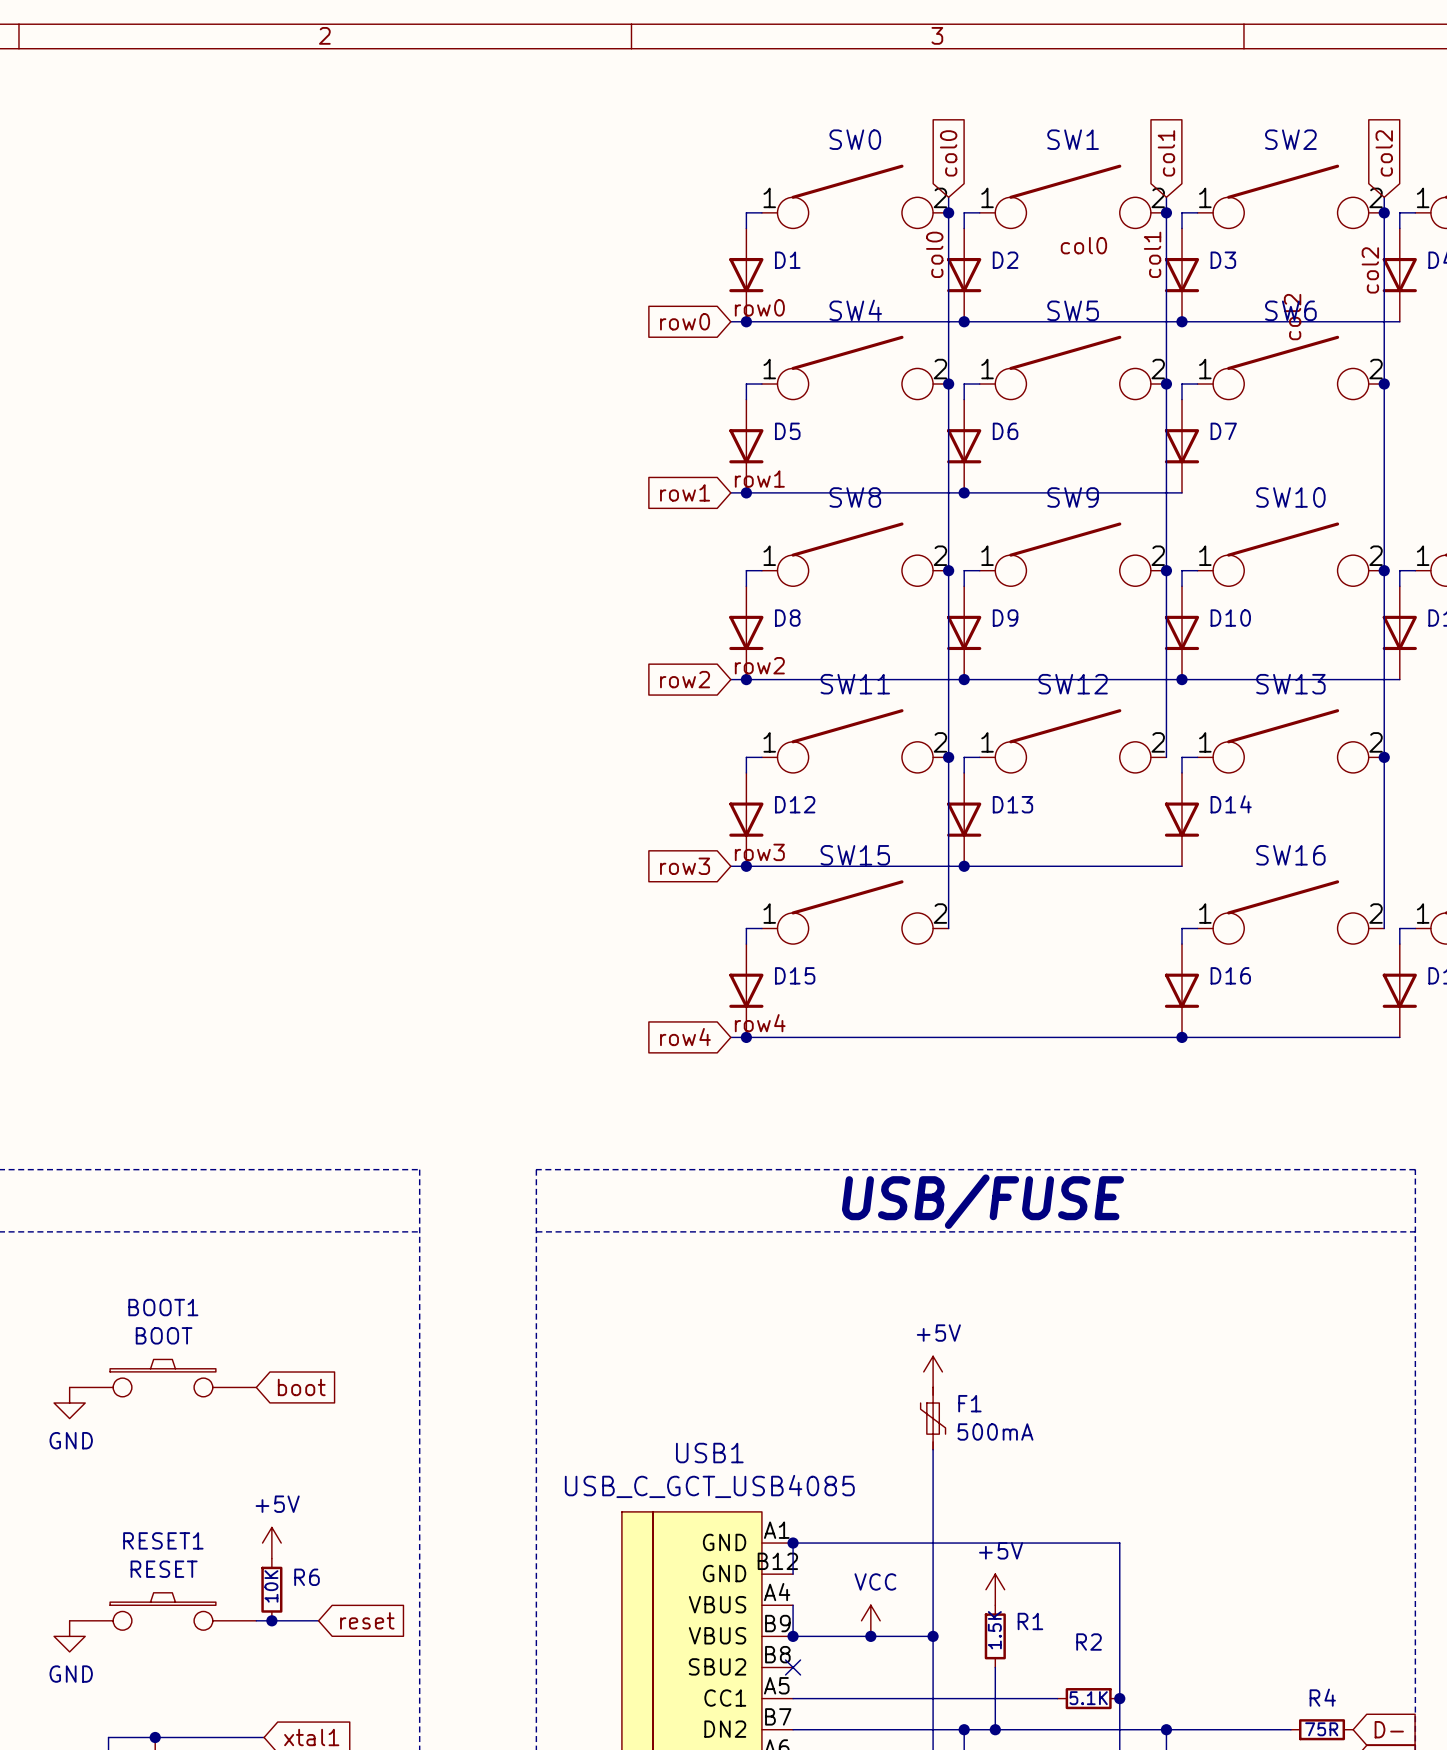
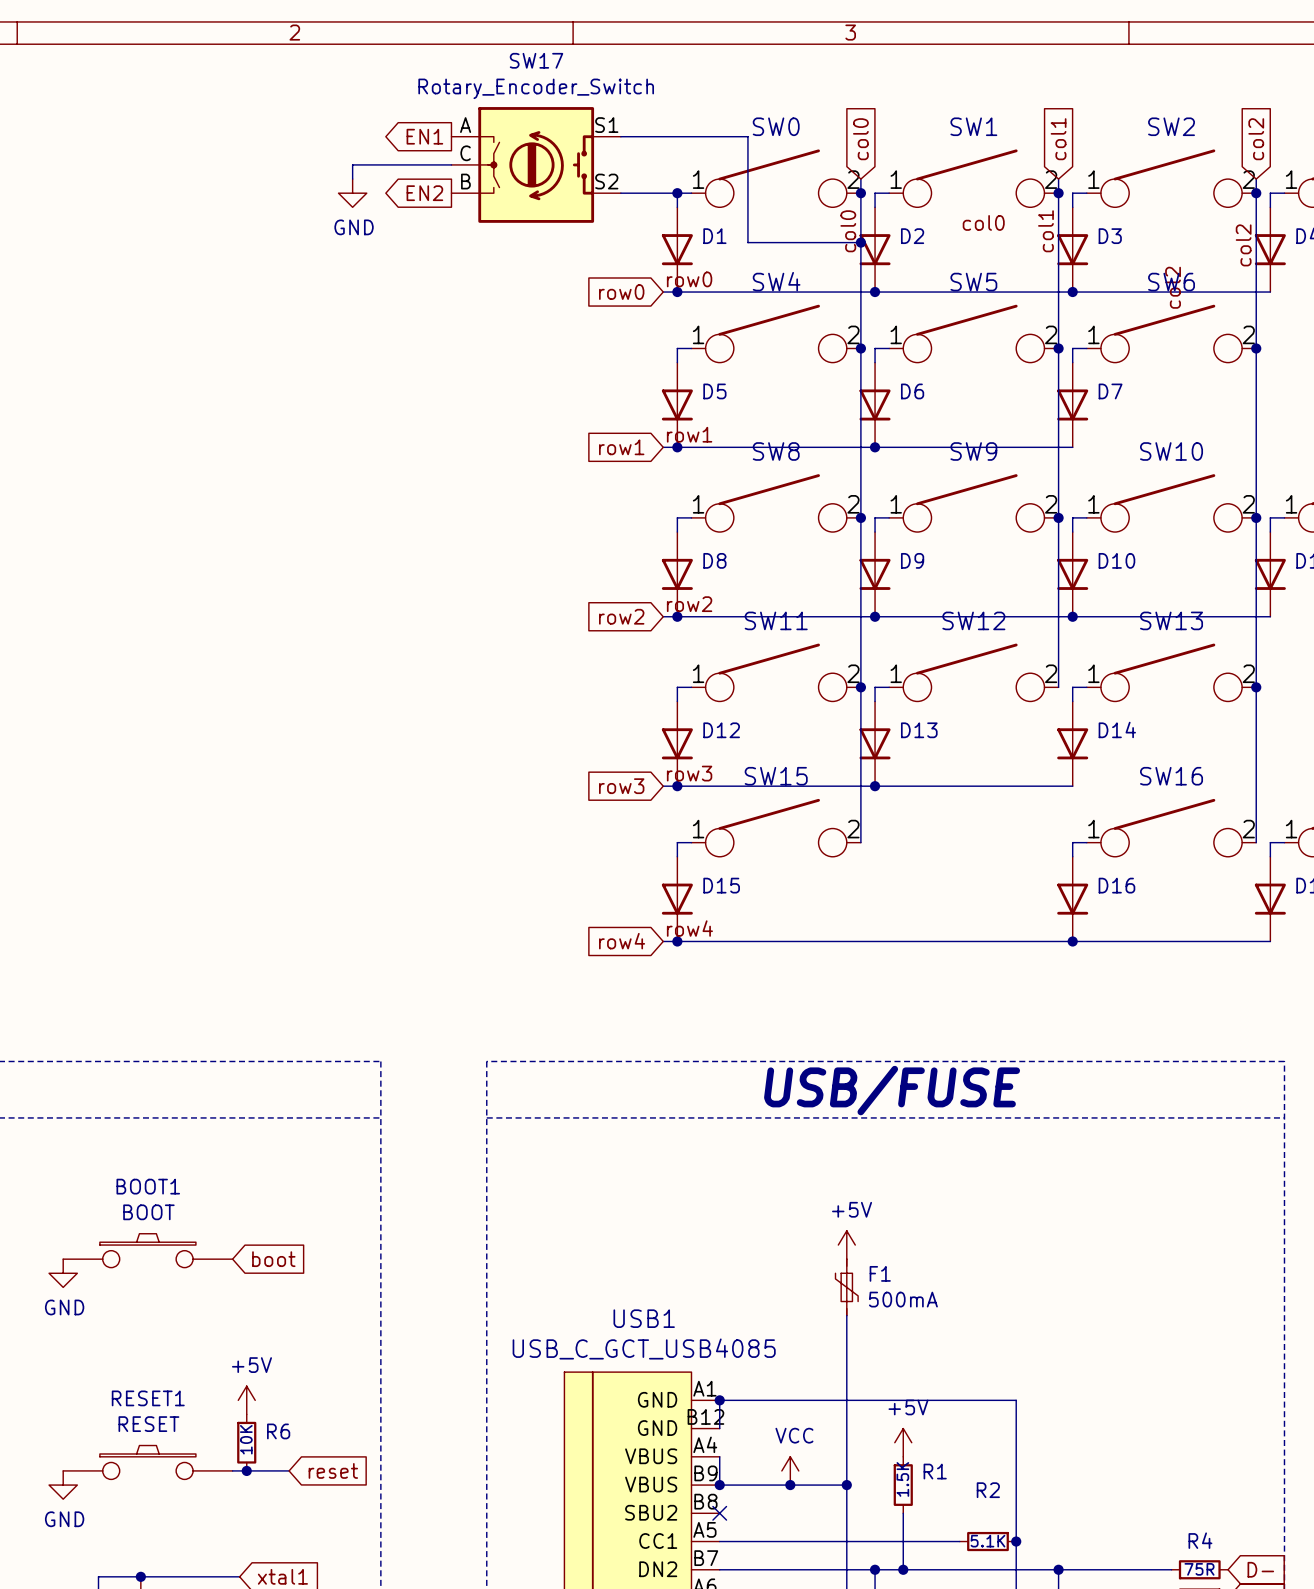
global label: none -> EN1 (424, 136)
wire: none -> (620, 136) (747, 136) (747, 242) (860, 242)
wire: none -> (451, 164) (352, 164) (352, 179)
SW17: none -> Rotary_Encoder_Switch (536, 164)
power symbol: none -> GND (352, 193)
global label: none -> EN2 (424, 193)
wire: none -> (620, 193) (677, 193)
junction: none -> (677, 193)
junction: none -> (860, 242)

